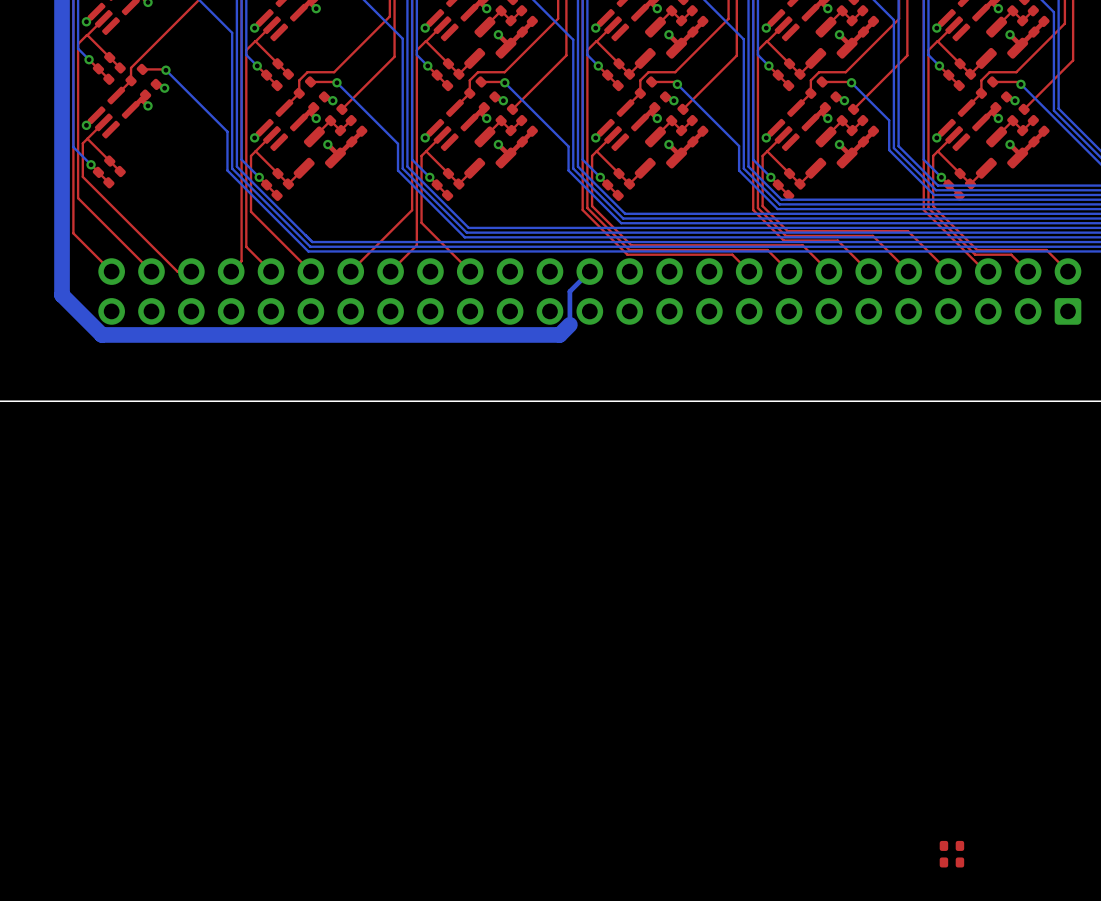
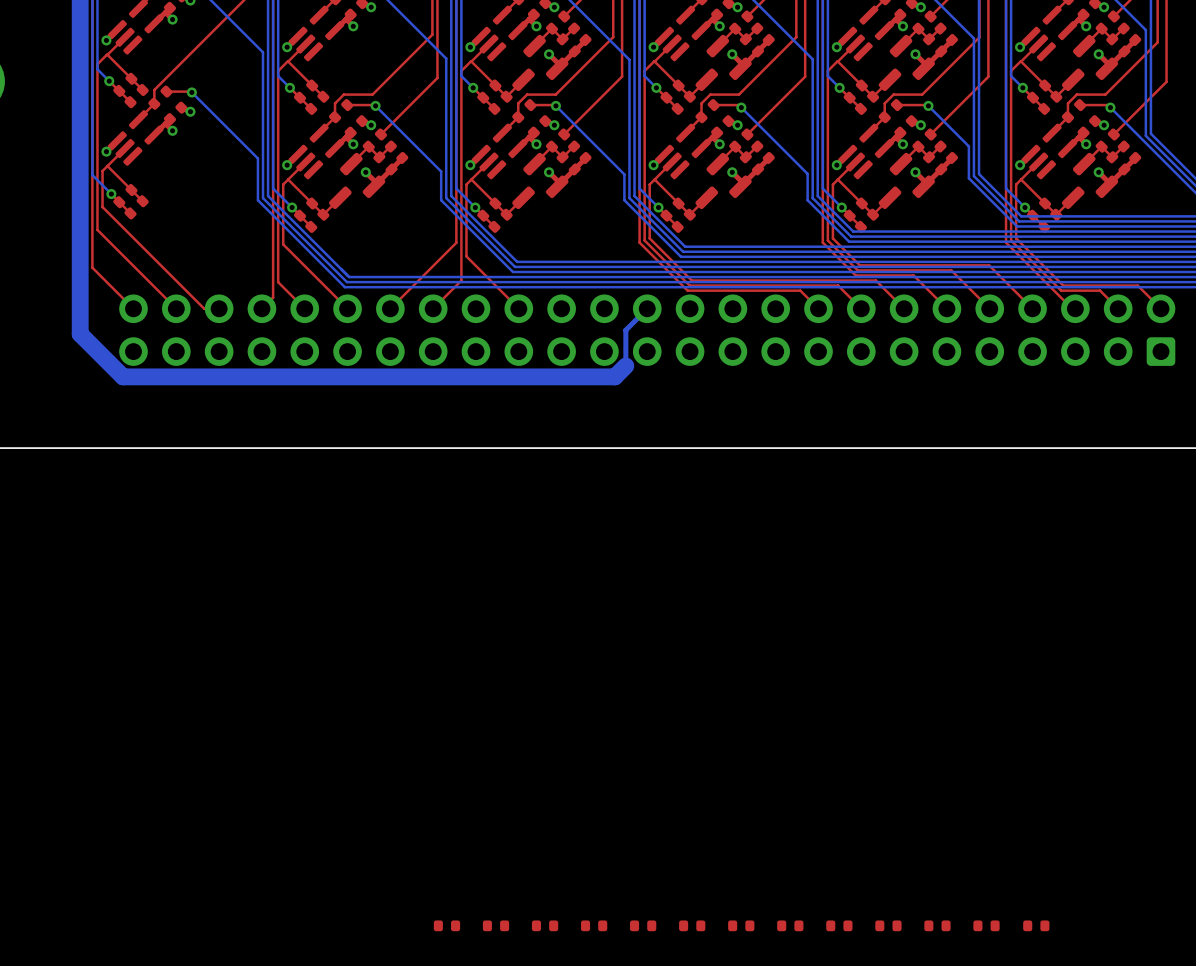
part: none -> (446, 925)
part: none -> (496, 925)
part: none -> (545, 925)
part: none -> (594, 925)
part: none -> (643, 925)
part: none -> (692, 925)
part: none -> (741, 925)
part: none -> (790, 925)
part: none -> (839, 925)
part: none -> (888, 925)
part: none -> (937, 925)
part: none -> (986, 925)
part: (951, 862) -> none

